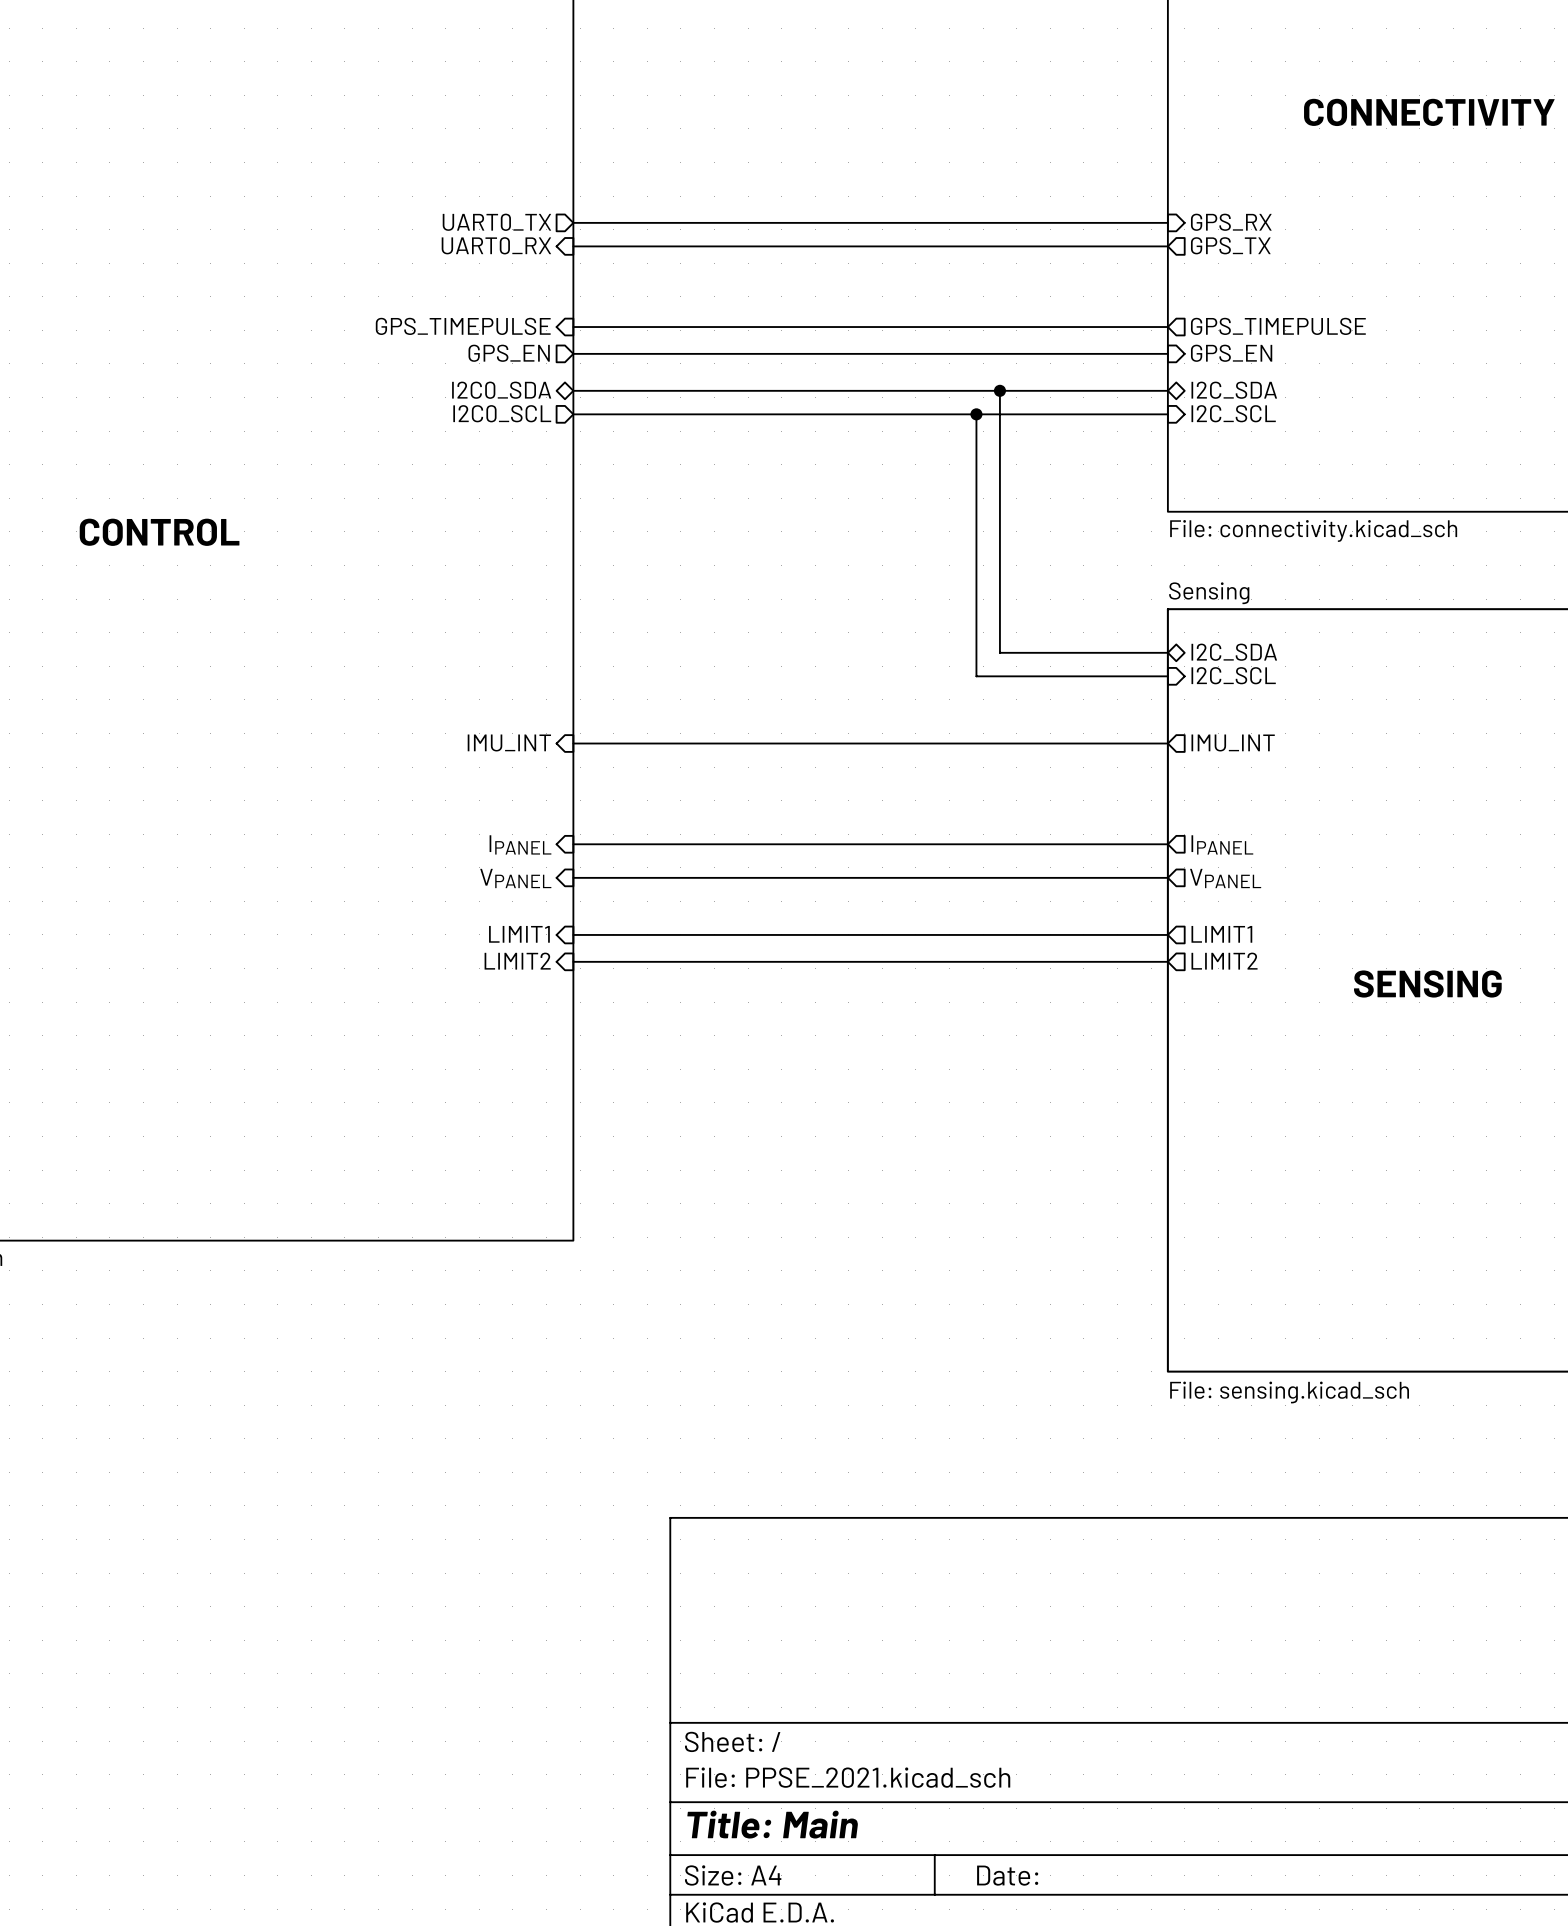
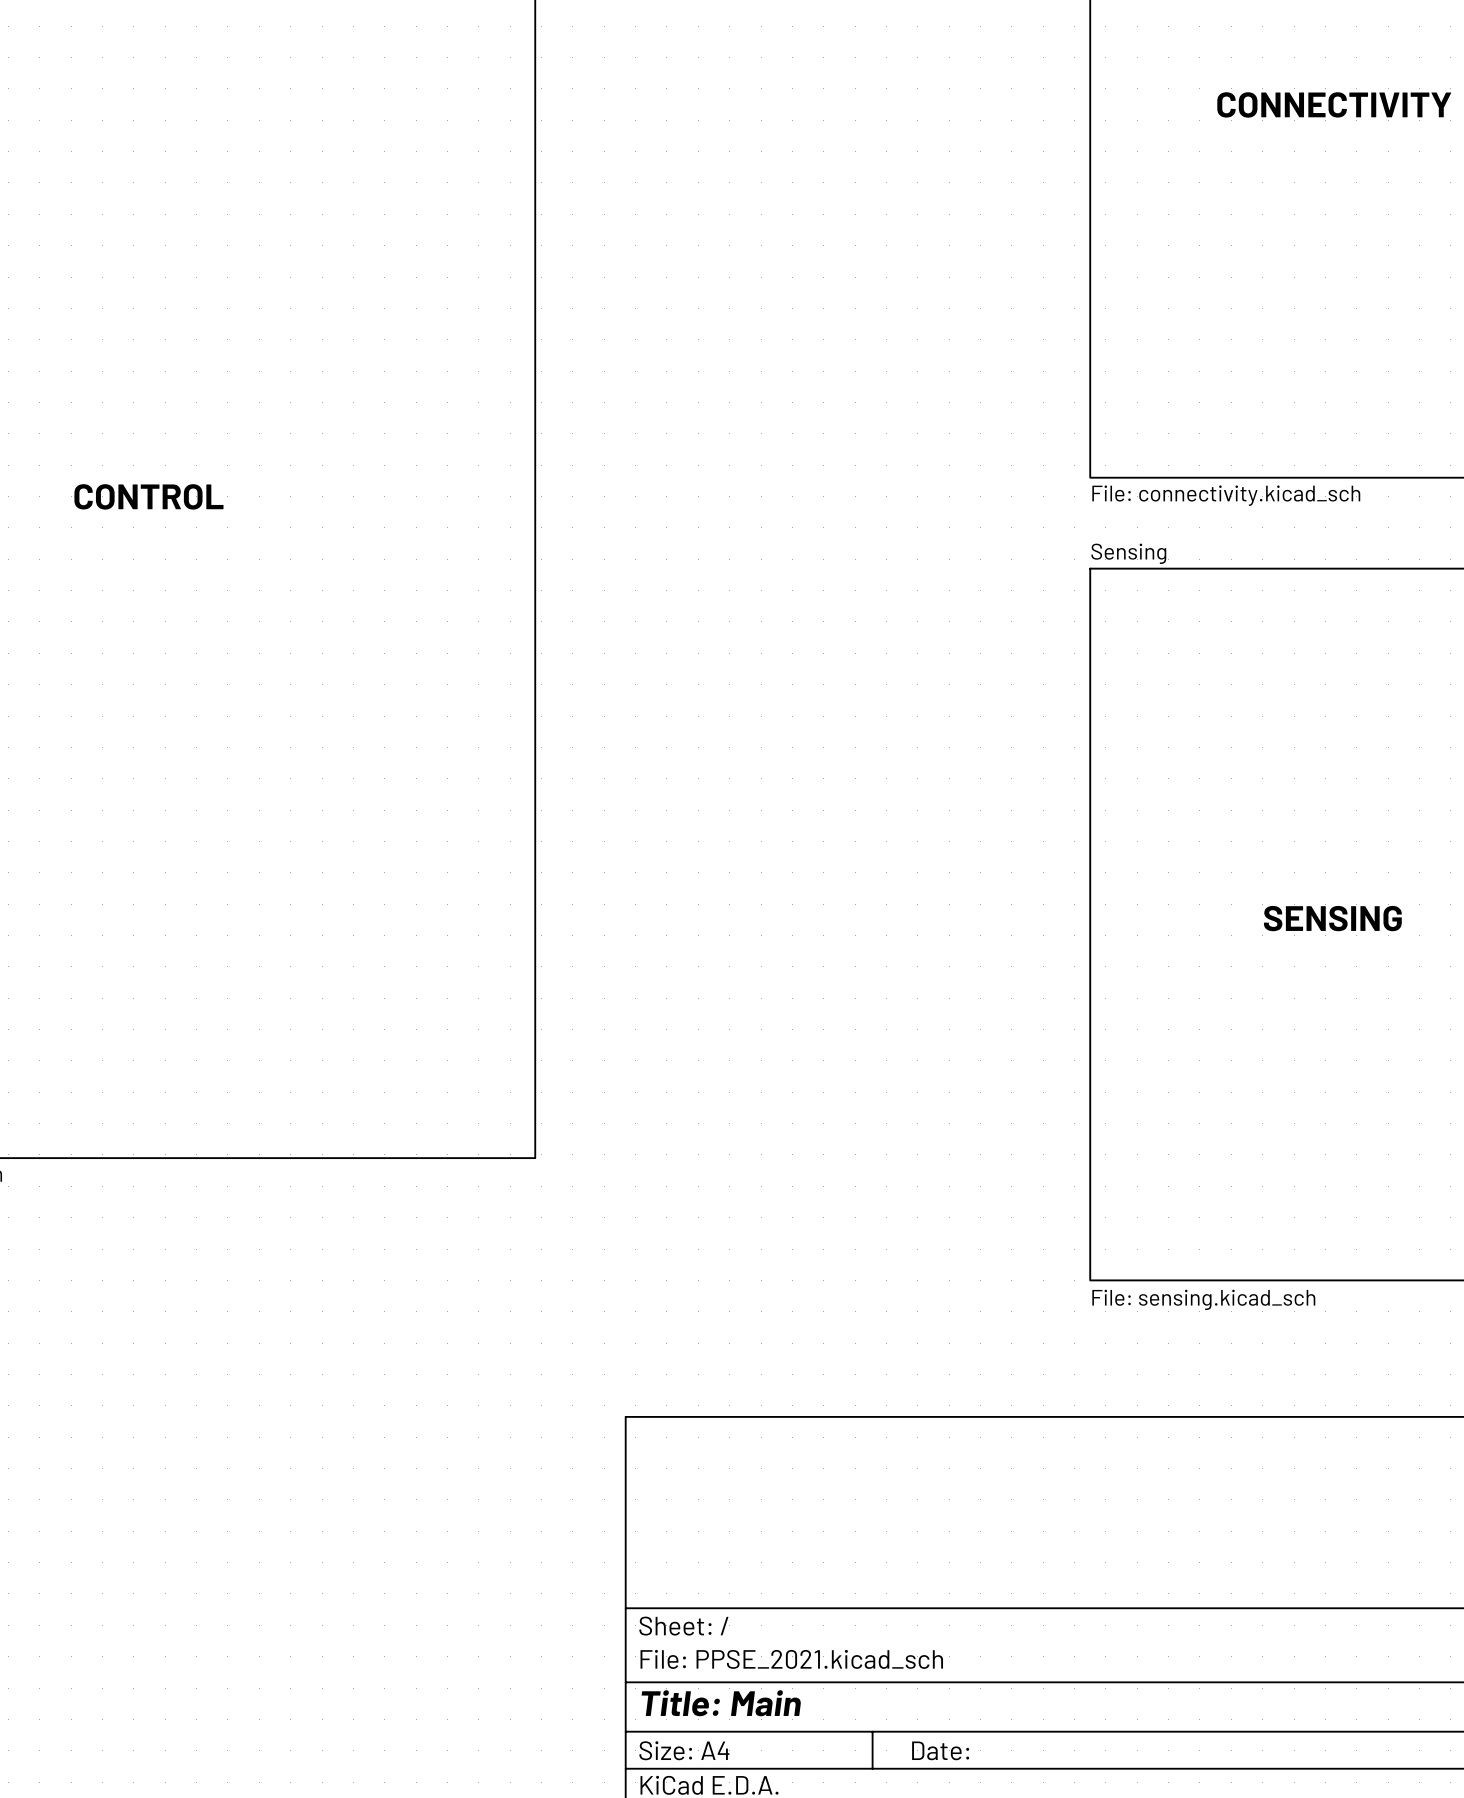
sheet pin: UART0_TX (496, 222) -> none
wire: (573, 222) (1167, 222) -> none
sheet pin: GPS_RX (1231, 222) -> none
sheet pin: UART0_RX (496, 245) -> none
sheet pin: GPS_TX (1230, 245) -> none
wire: (573, 246) (1167, 246) -> none
sheet pin: GPS_TIMEPULSE (463, 326) -> none
sheet pin: GPS_TIMEPULSE (1278, 326) -> none
wire: (573, 327) (1167, 327) -> none
sheet pin: GPS_EN (509, 353) -> none
wire: (573, 353) (1167, 353) -> none
sheet pin: GPS_EN (1231, 353) -> none
sheet pin: I2C0_SDA (501, 390) -> none
wire: (573, 390) (1167, 390) -> none
wire: (999, 390) (999, 652) (1167, 652) -> none
junction: (999, 390) -> none
sheet pin: I2C_SDA (1234, 390) -> none
sheet pin: I2C0_SCL (502, 413) -> none
sheet pin: I2C_SCL (1233, 413) -> none
wire: (573, 414) (1167, 414) -> none
wire: (976, 414) (976, 676) (1167, 676) -> none
junction: (976, 414) -> none
sheet pin: I2C_SDA (1234, 652) -> none
sheet pin: I2C_SCL (1233, 675) -> none
sheet pin: IMU_INT (509, 742) -> none
sheet pin: IMU_INT (1233, 742) -> none
wire: (573, 743) (1167, 743) -> none
sheet pin: IPANEL (520, 844) -> none
wire: (573, 844) (1167, 844) -> none
sheet pin: IPANEL (1222, 844) -> none
wire: (573, 877) (1167, 877) -> none
sheet pin: VPANEL (515, 878) -> none
sheet pin: VPANEL (1225, 878) -> none
sheet pin: LIMIT1 (519, 934) -> none
wire: (573, 934) (1167, 934) -> none
sheet pin: LIMIT1 (1221, 934) -> none
sheet pin: LIMIT2 (517, 961) -> none
wire: (573, 961) (1167, 961) -> none
sheet pin: LIMIT2 (1224, 961) -> none

